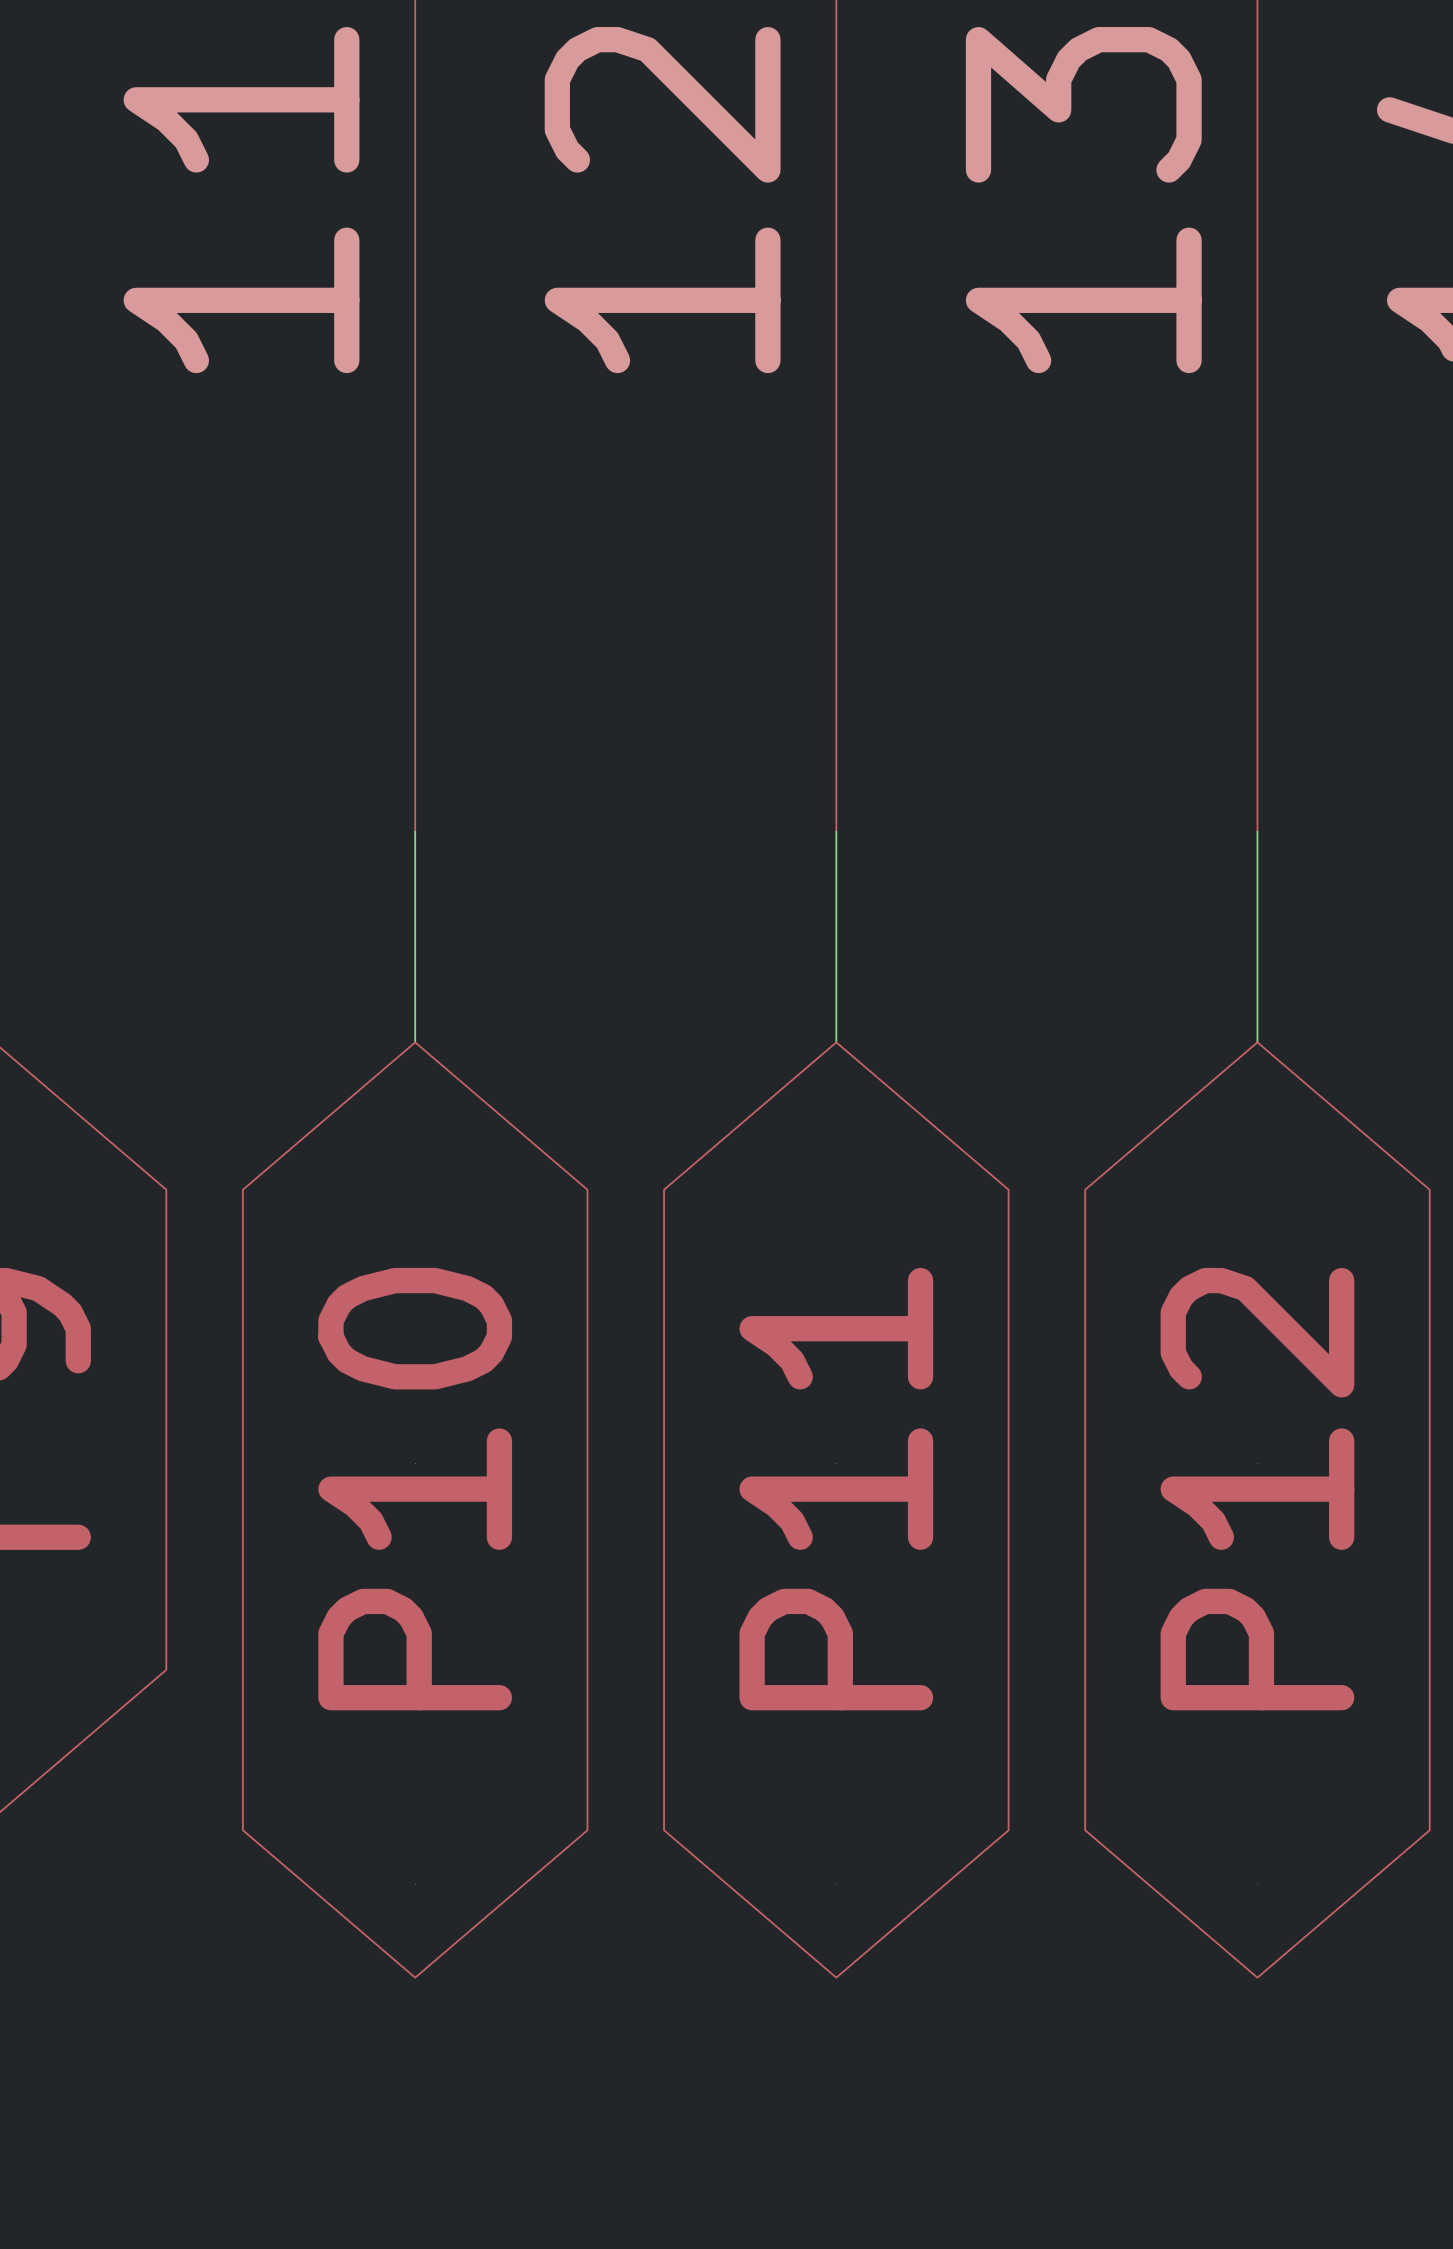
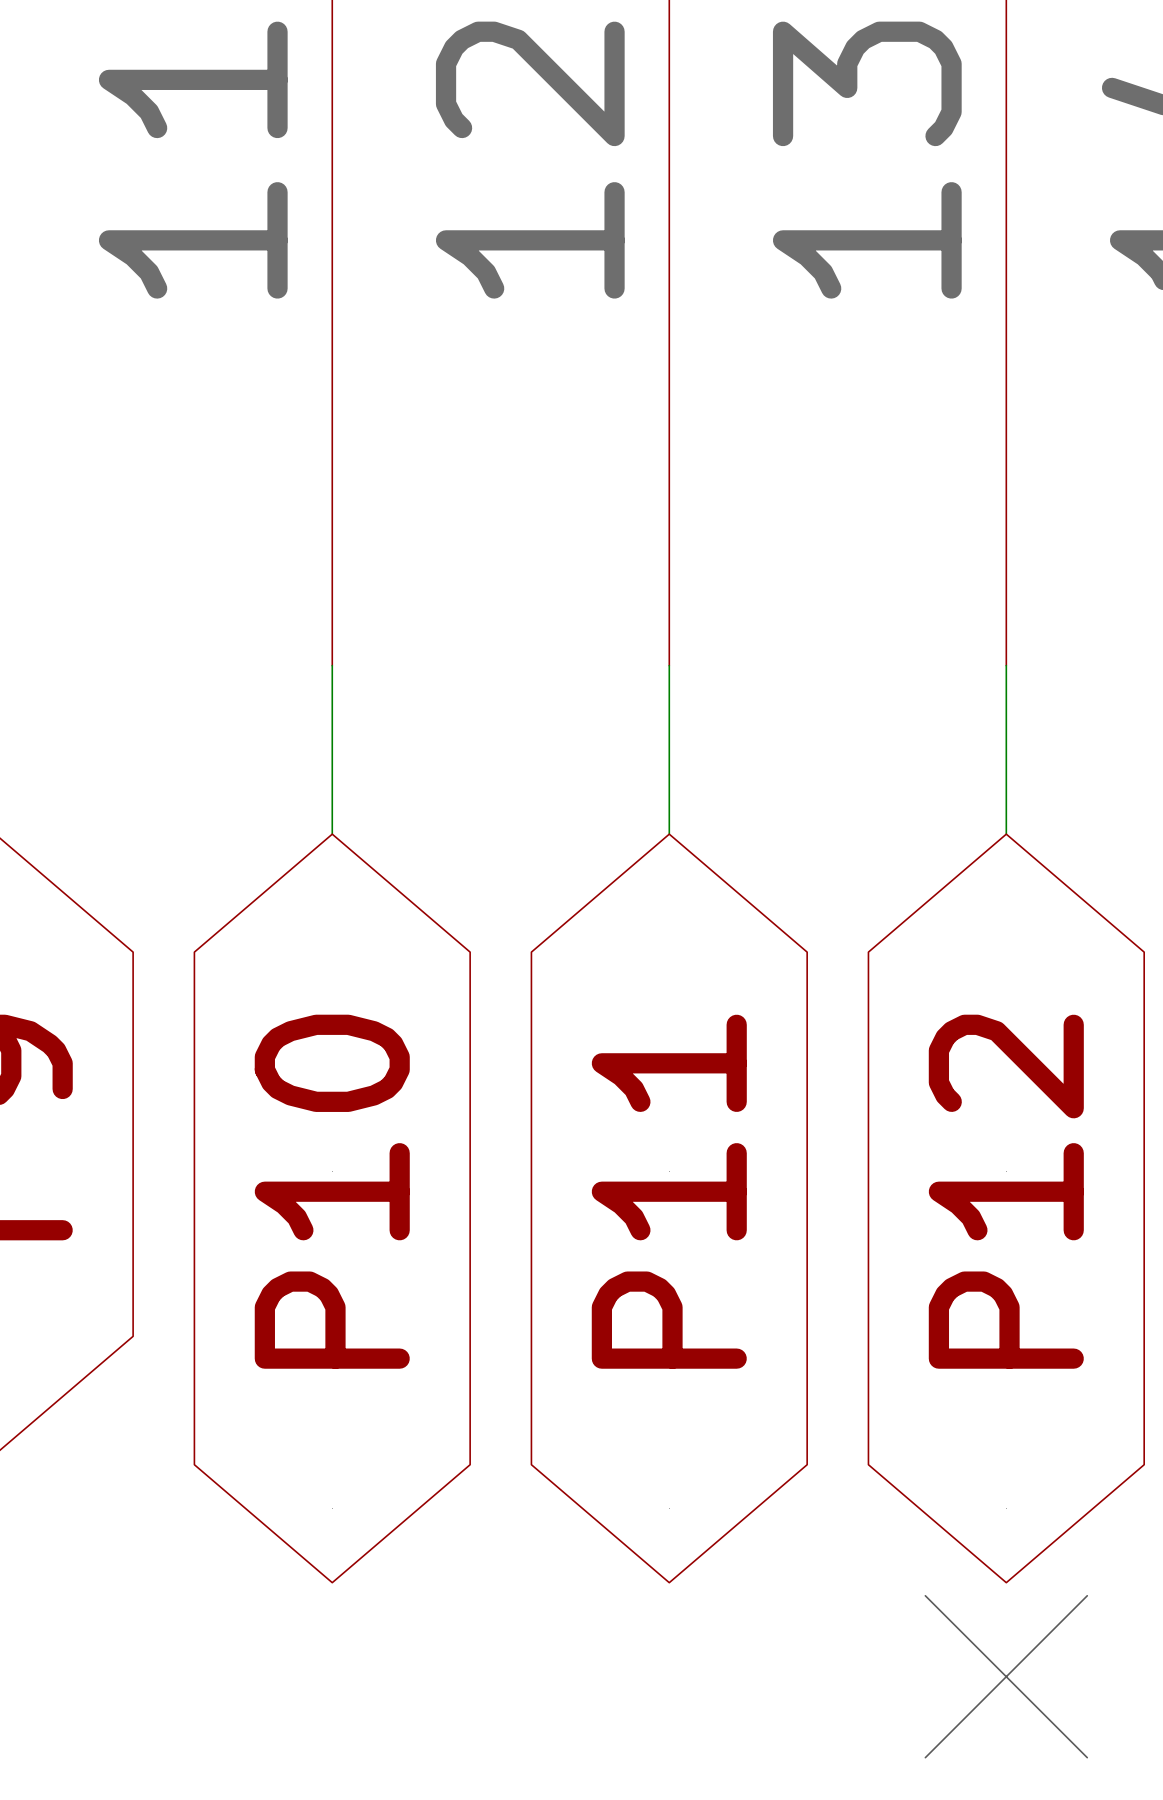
no-connect mark: none -> (1006, 1676)

